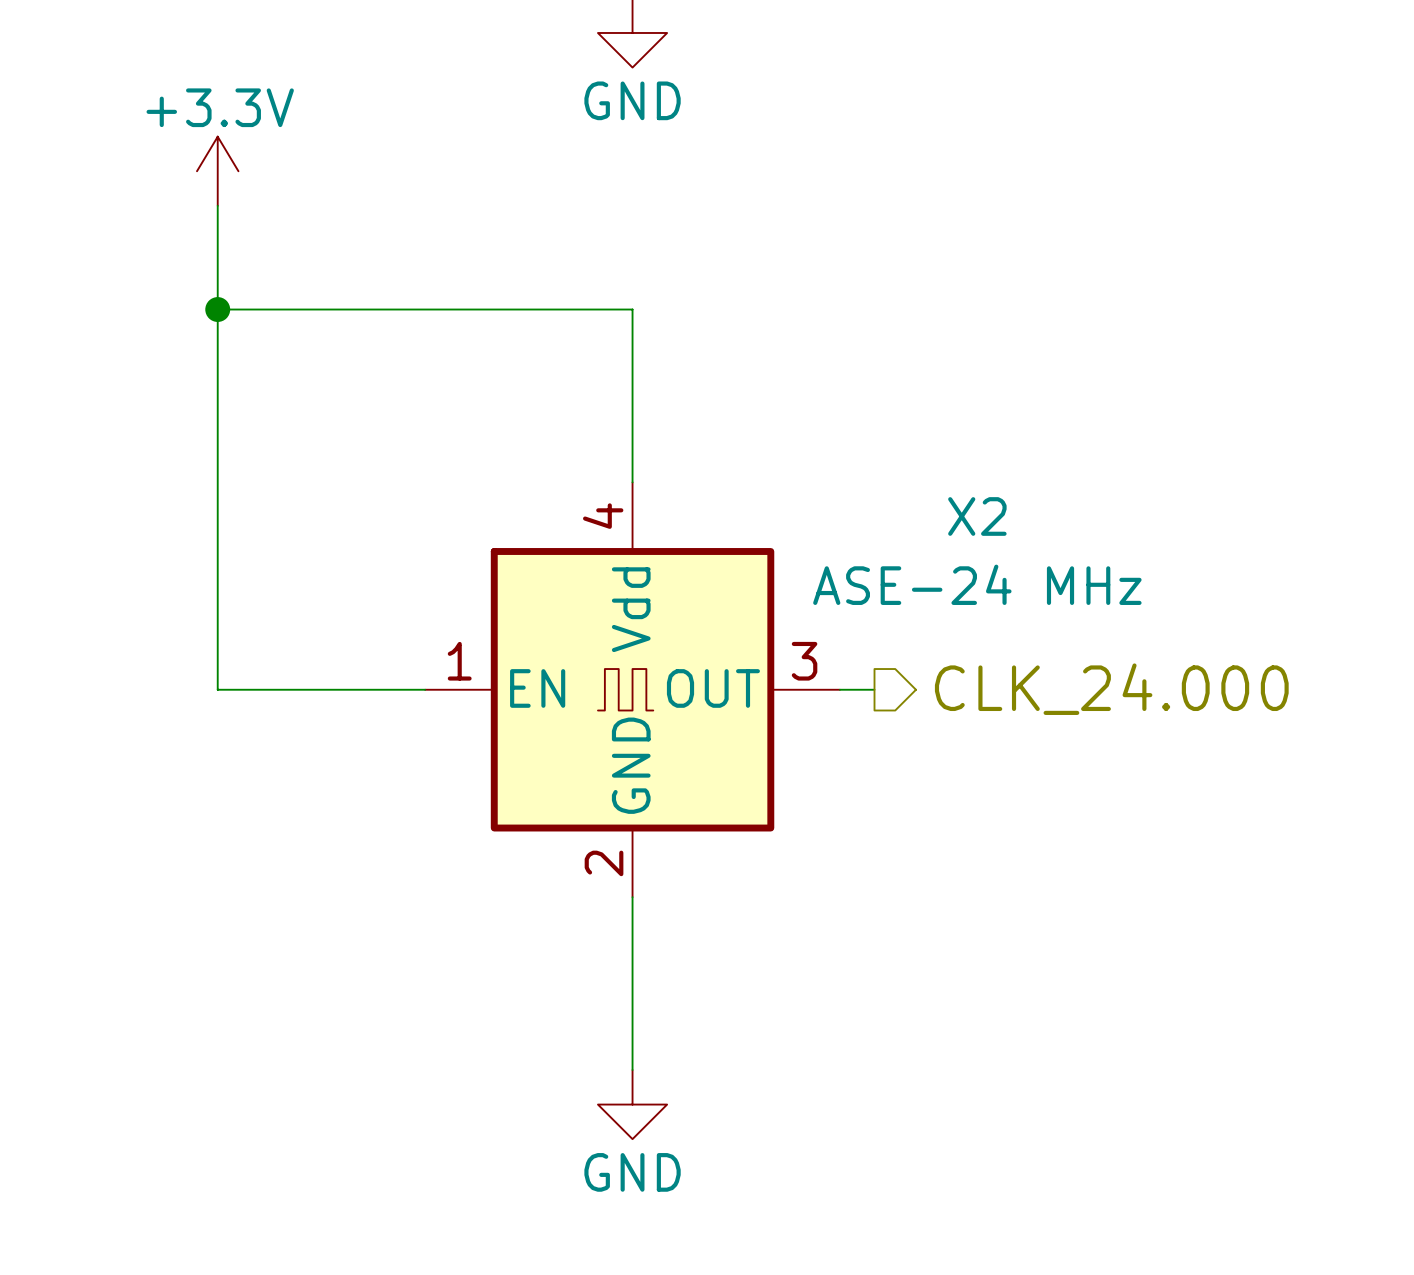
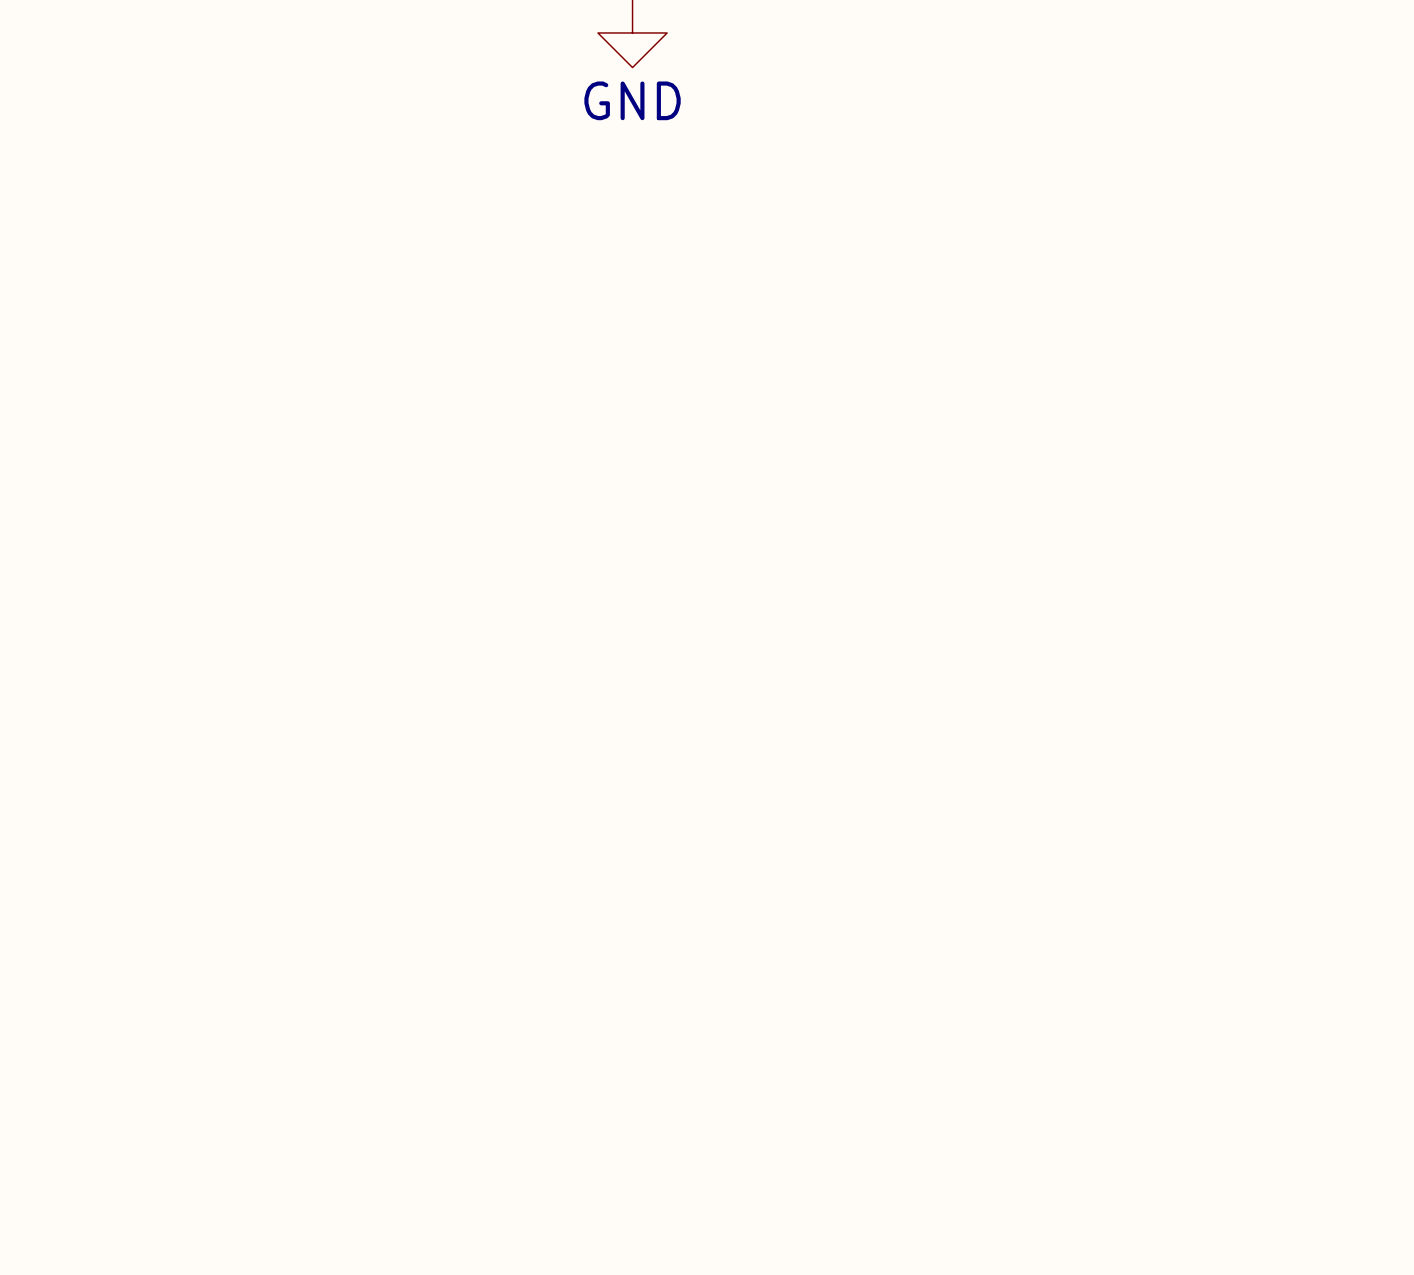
power symbol: +3.3V (217, 171) -> none
wire: (217, 205) (217, 689) (425, 689) -> none
wire: (217, 309) (632, 309) (632, 482) -> none
junction: (217, 309) -> none
X2: ASE-24 MHz (632, 689) -> none
wire: (839, 689) (874, 689) -> none
hierarchical label: CLK_24.000 (1111, 689) -> none
wire: (632, 897) (632, 1069) -> none
power symbol: GND (632, 1104) -> none

